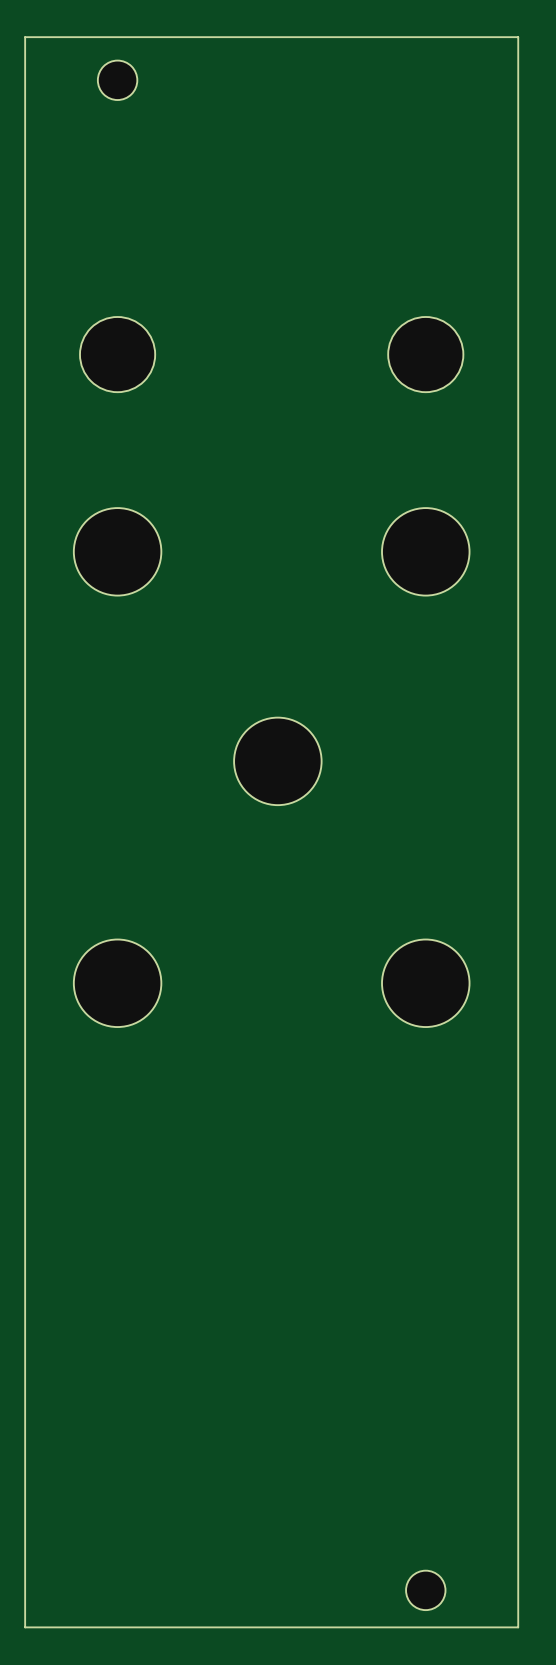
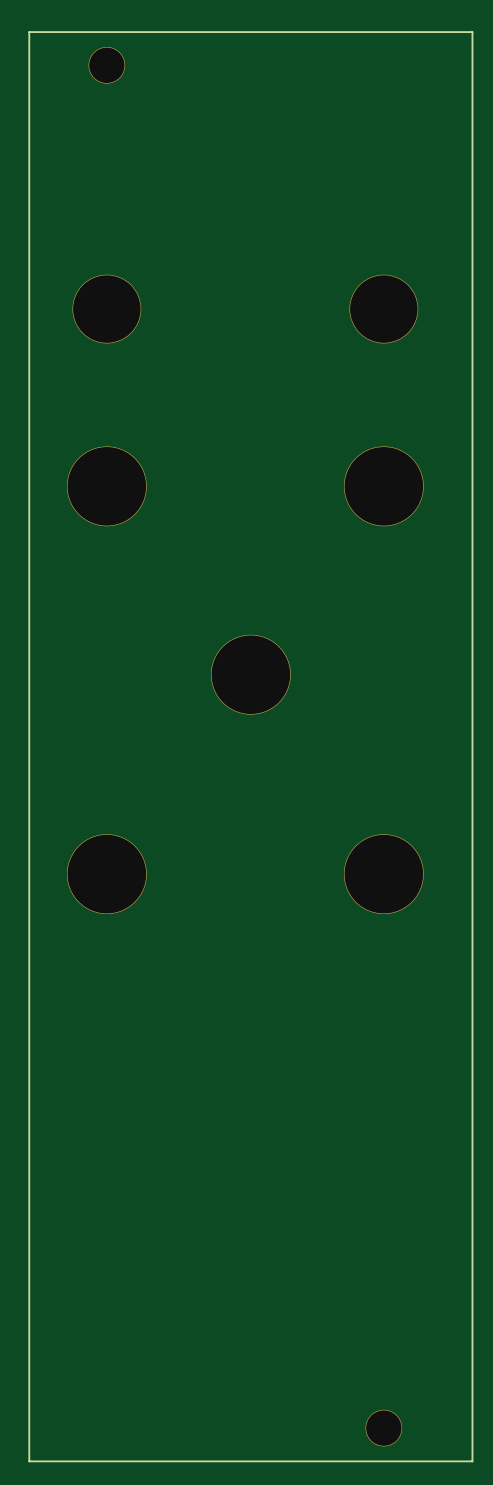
via: none -> (106, 65)
part: (117, 80) -> none
via: none -> (106, 309)
via: none -> (383, 309)
part: (117, 354) -> none
part: (425, 354) -> none
via: none -> (106, 486)
via: none -> (383, 486)
part: (117, 551) -> none
part: (425, 551) -> none
via: none -> (250, 674)
part: (277, 761) -> none
via: none -> (106, 874)
via: none -> (383, 874)
part: (117, 983) -> none
part: (425, 983) -> none
via: none -> (383, 1428)
part: (425, 1590) -> none

